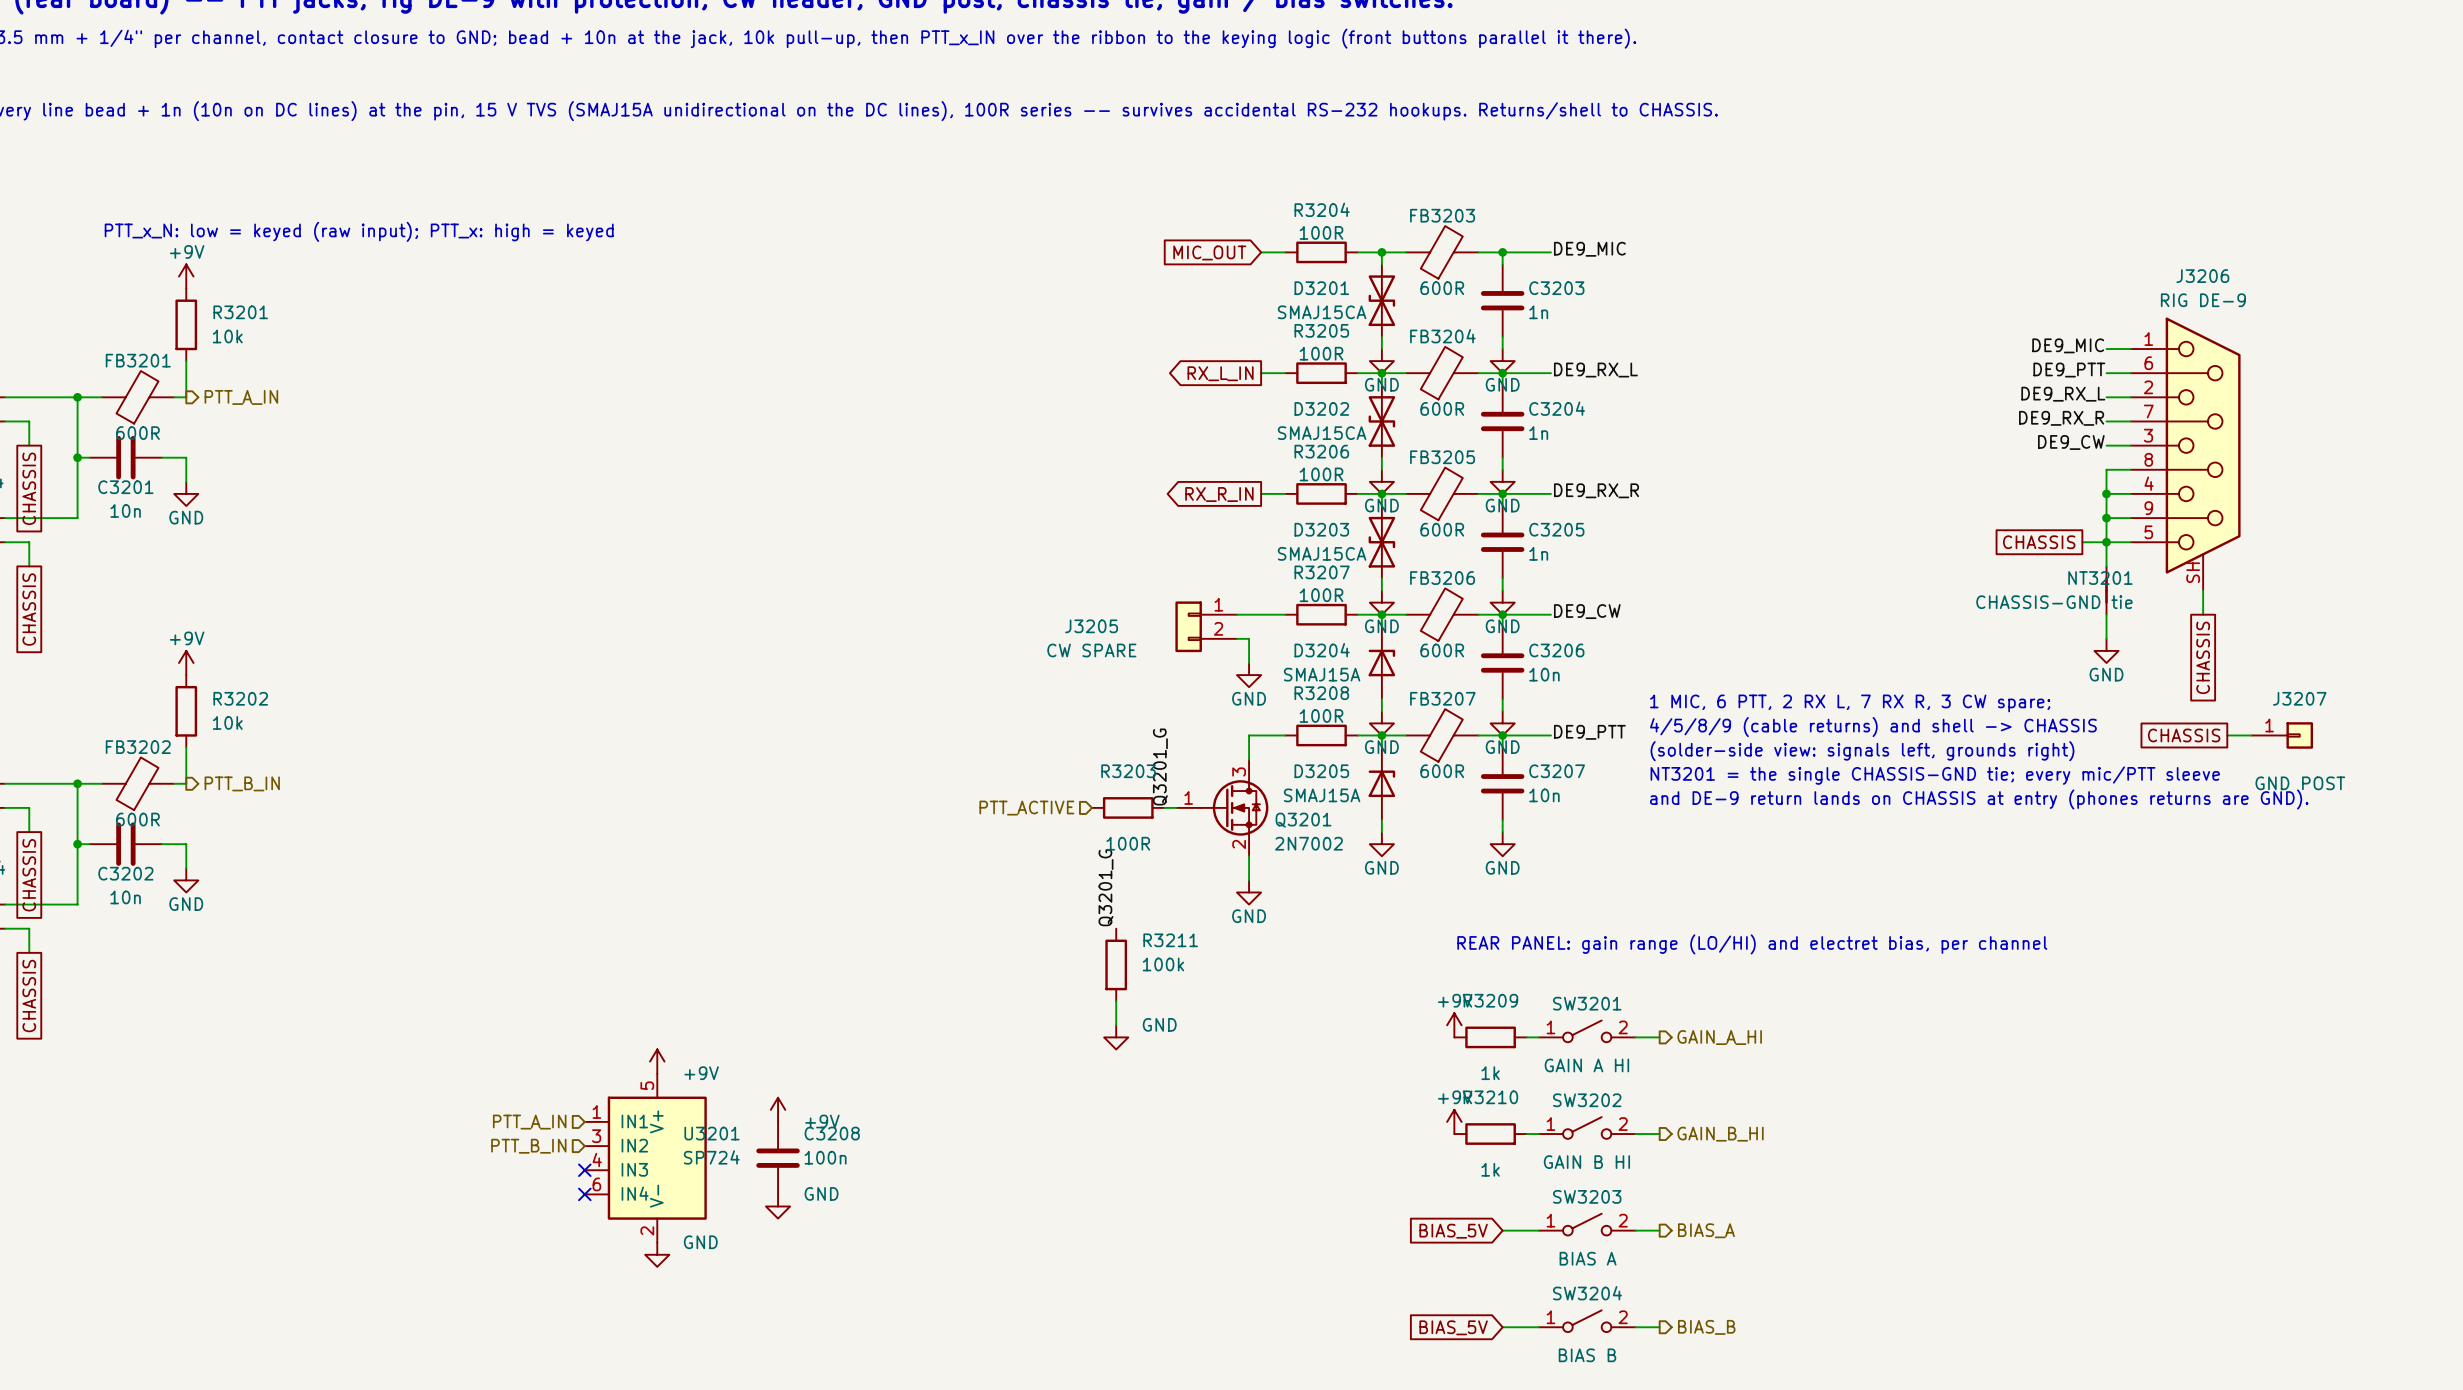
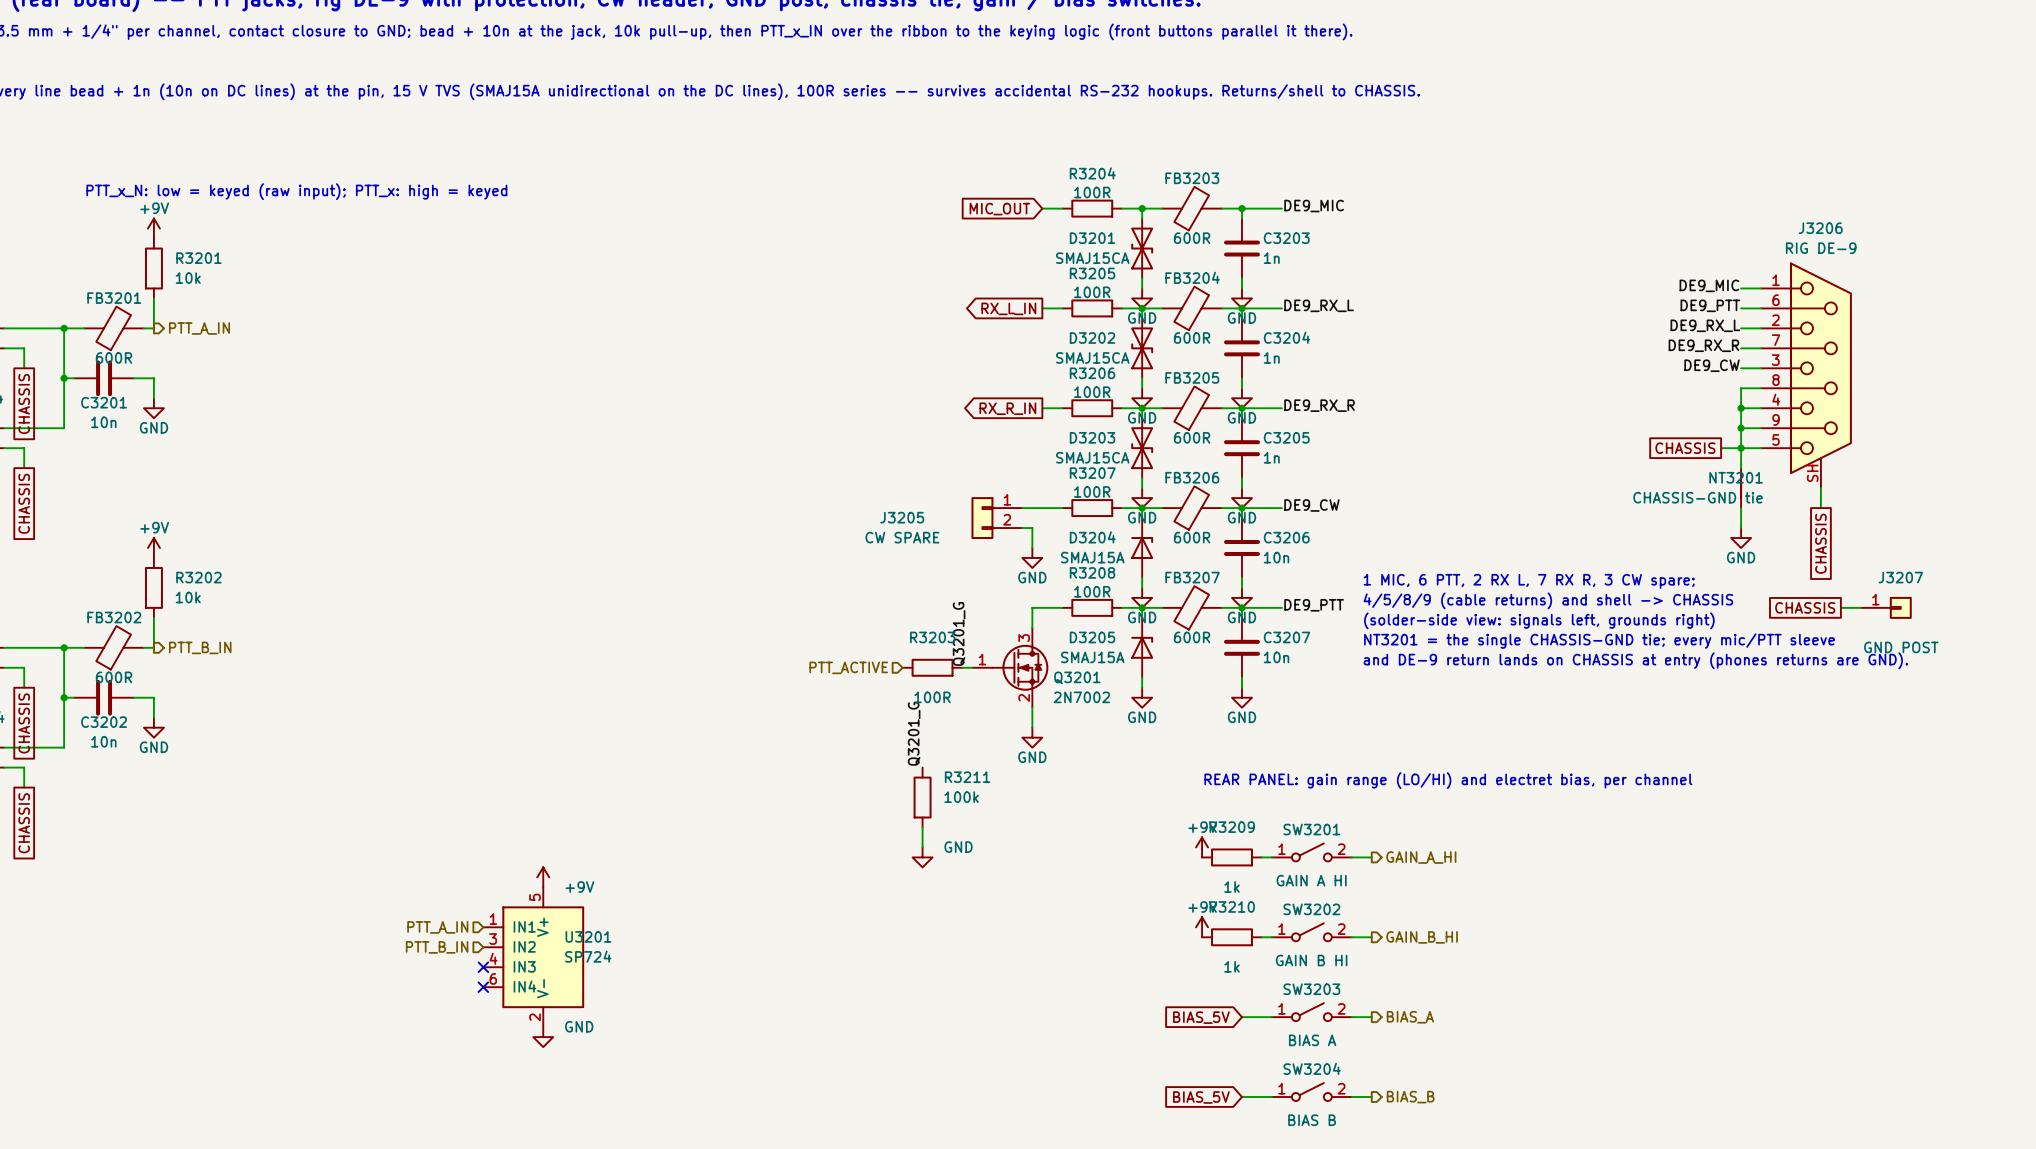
power symbol: +9V (778, 1109) -> none
C3208: 100n (778, 1158) -> none
power symbol: GND (778, 1206) -> none

